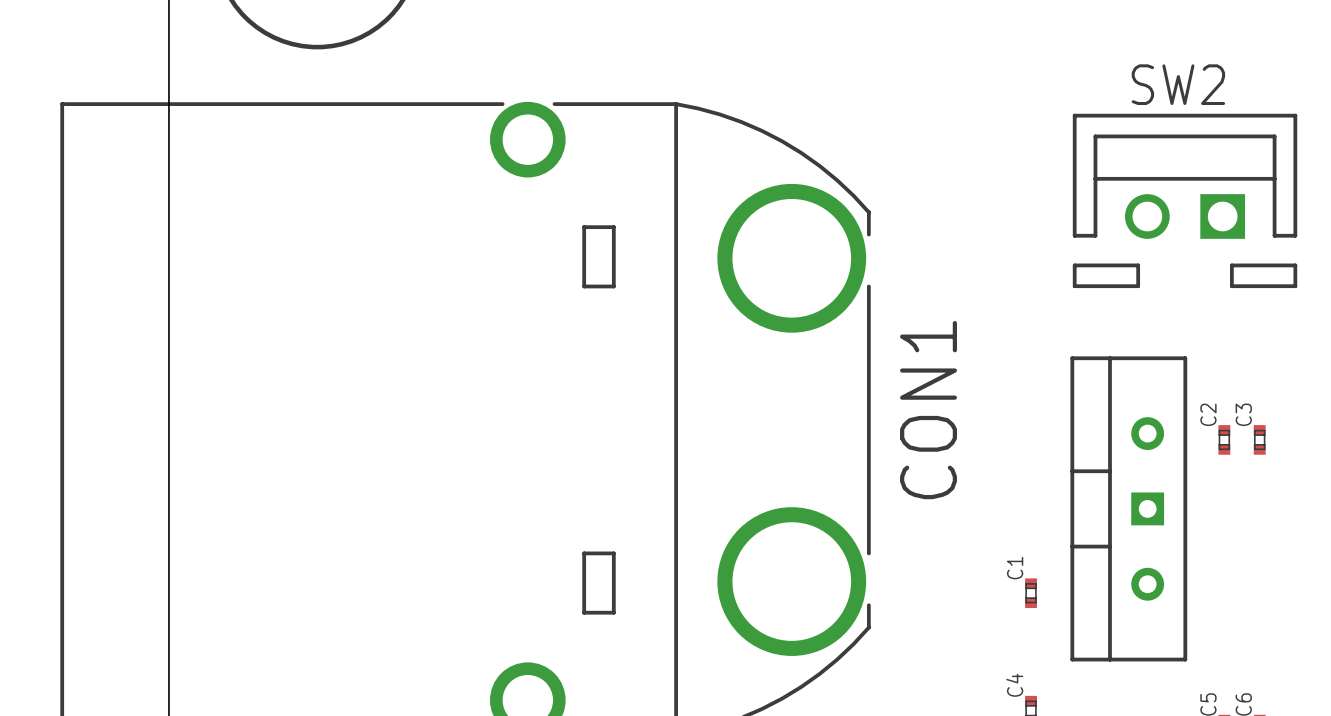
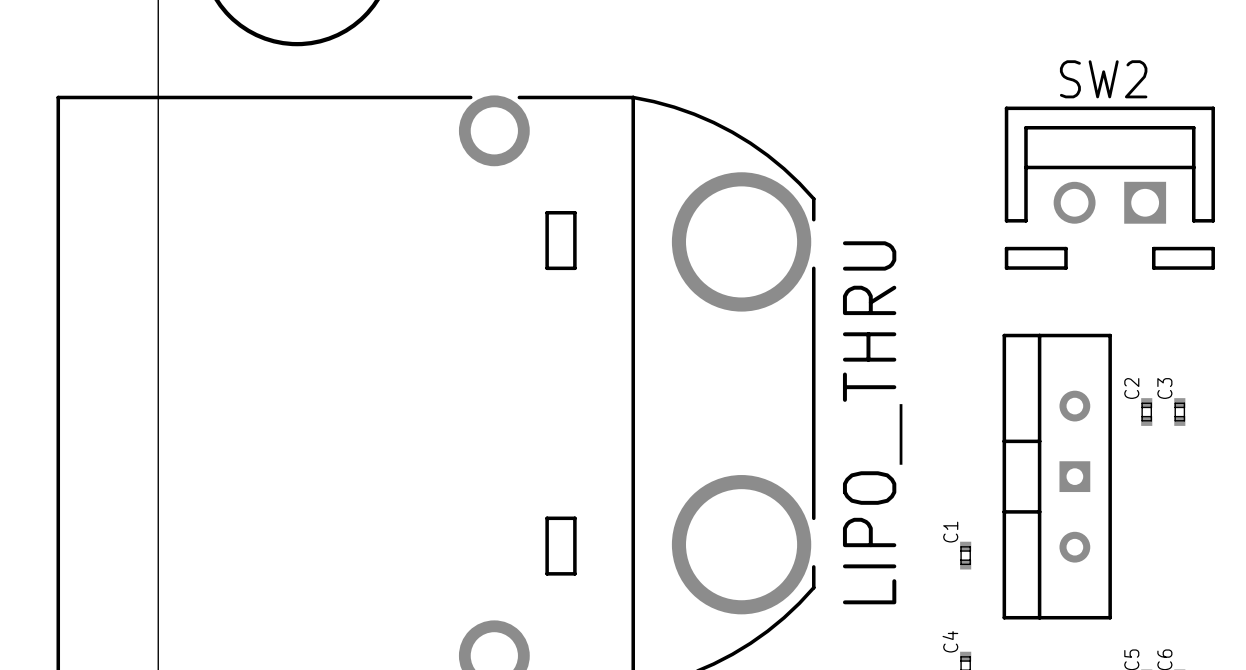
CON1 name: CON1 (928, 410) -> LIPO＿THRU (873, 422)

